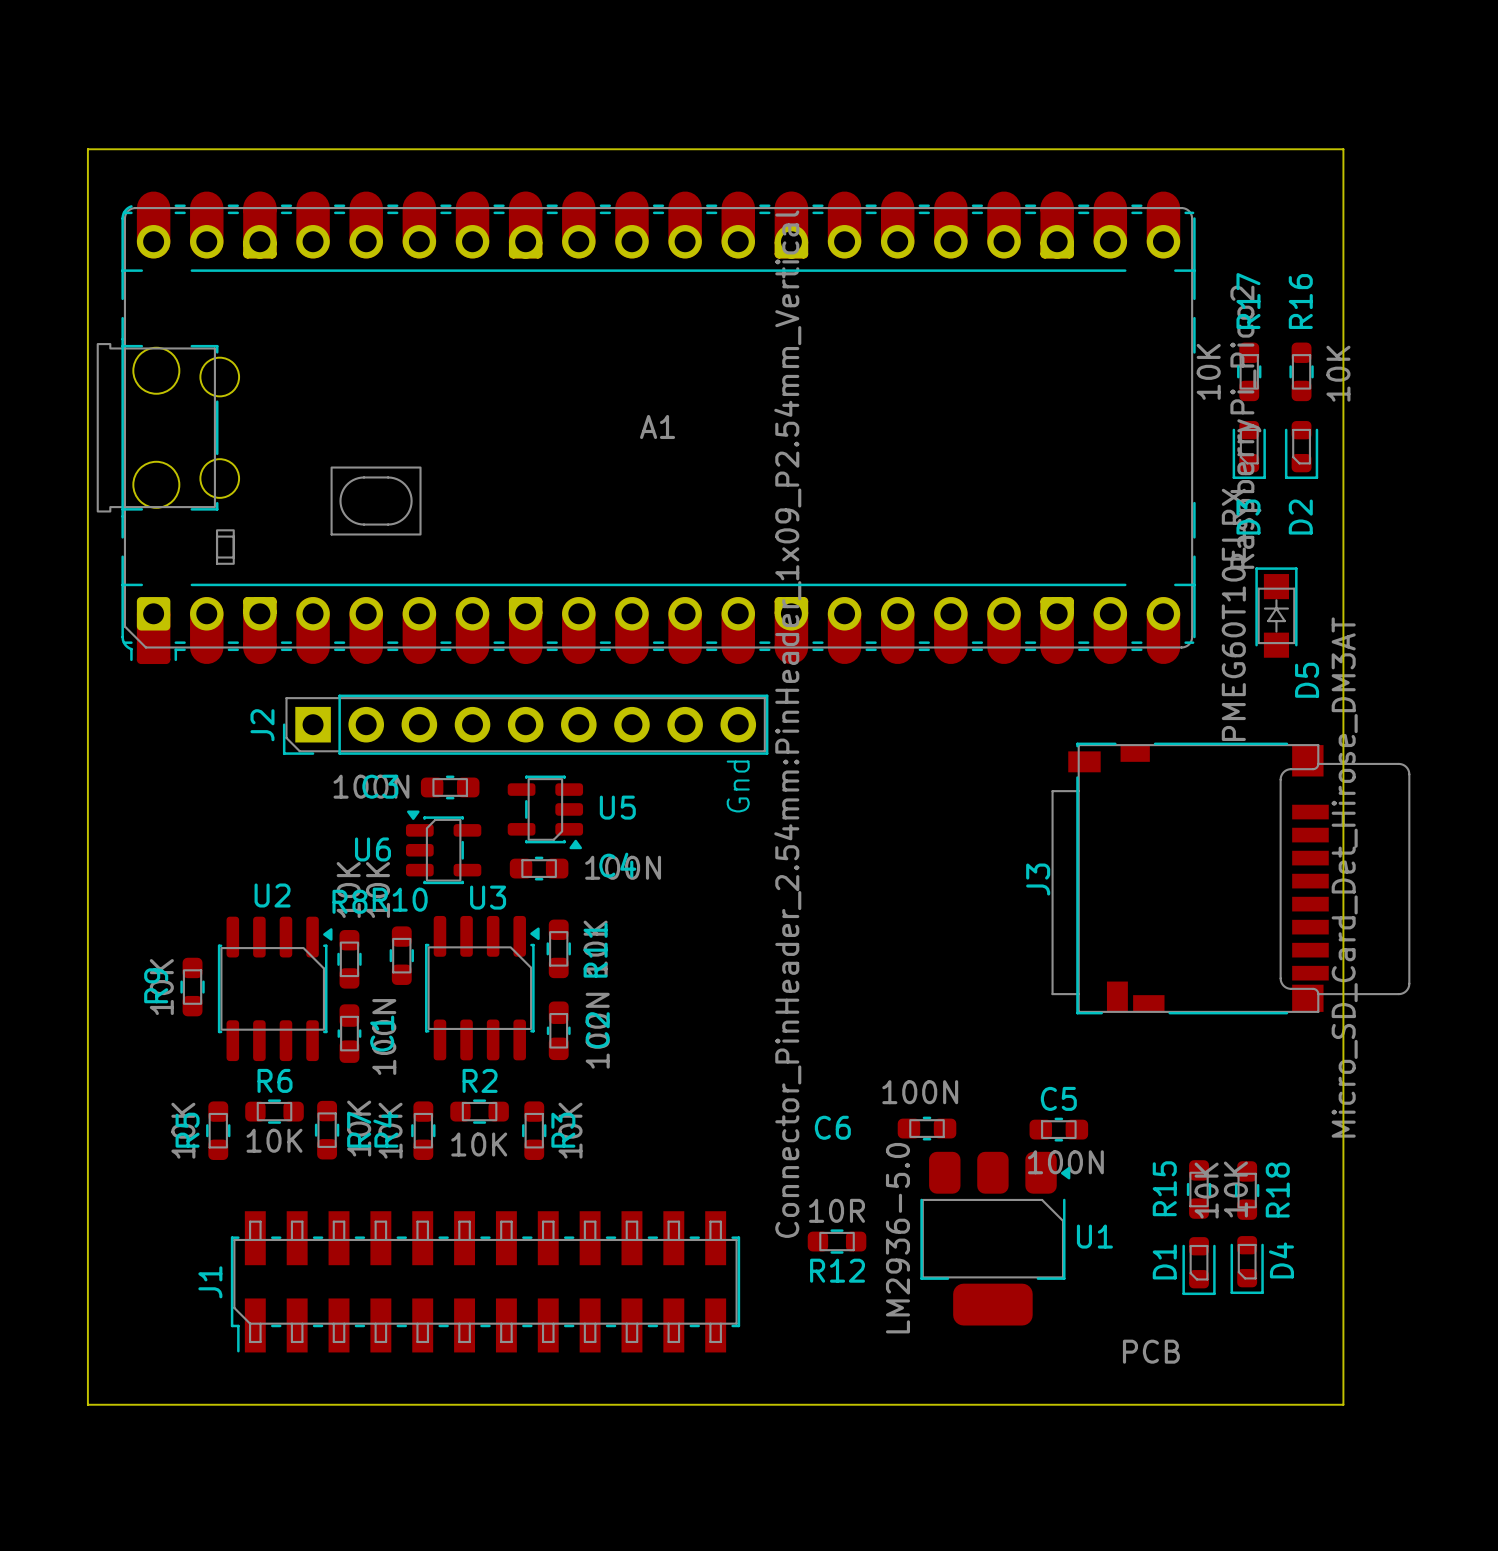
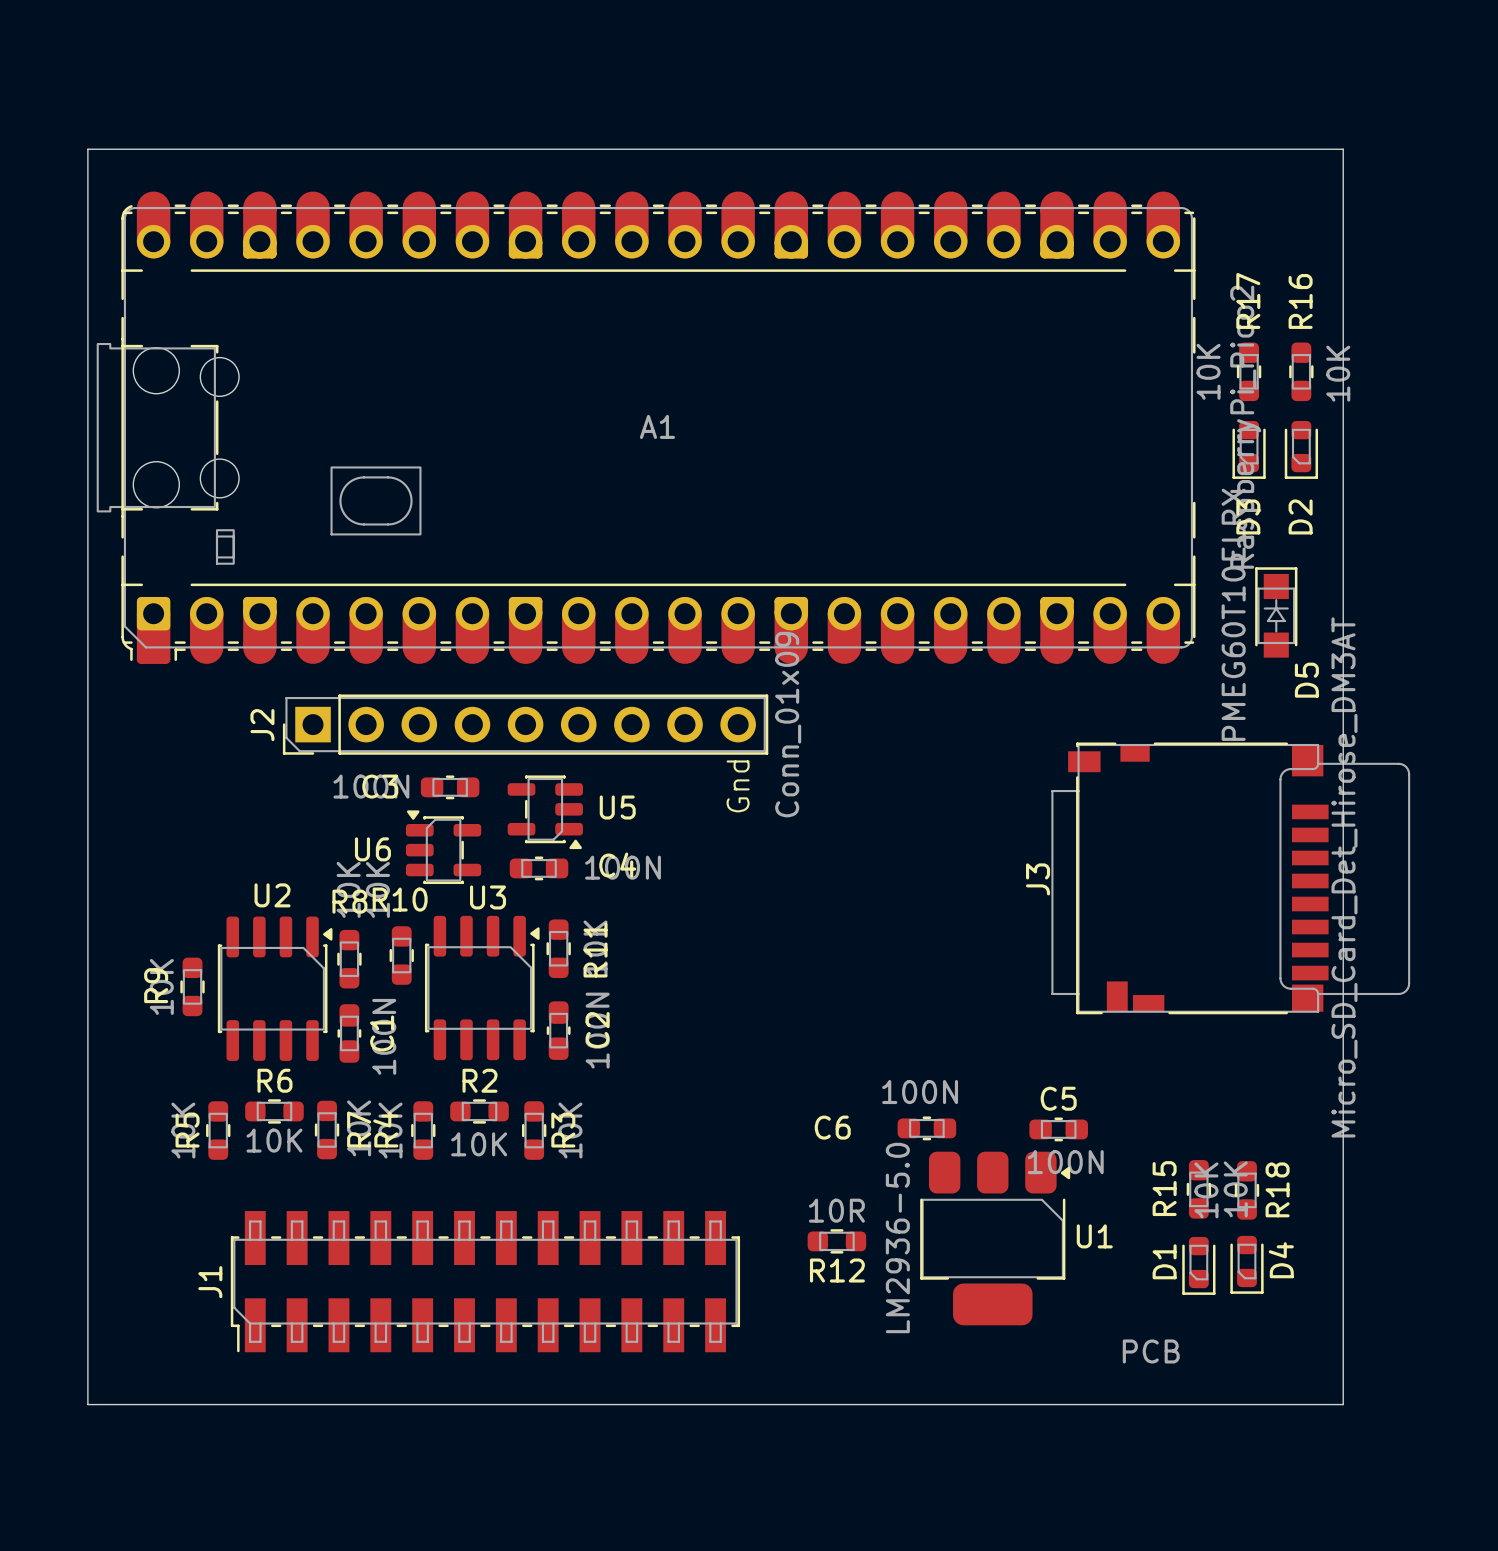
J2 value: Connector_PinHeader_2.54mm:PinHeader_1x09_P2.54mm_Vertical (787, 724) -> Conn_01x09 (788, 724)

